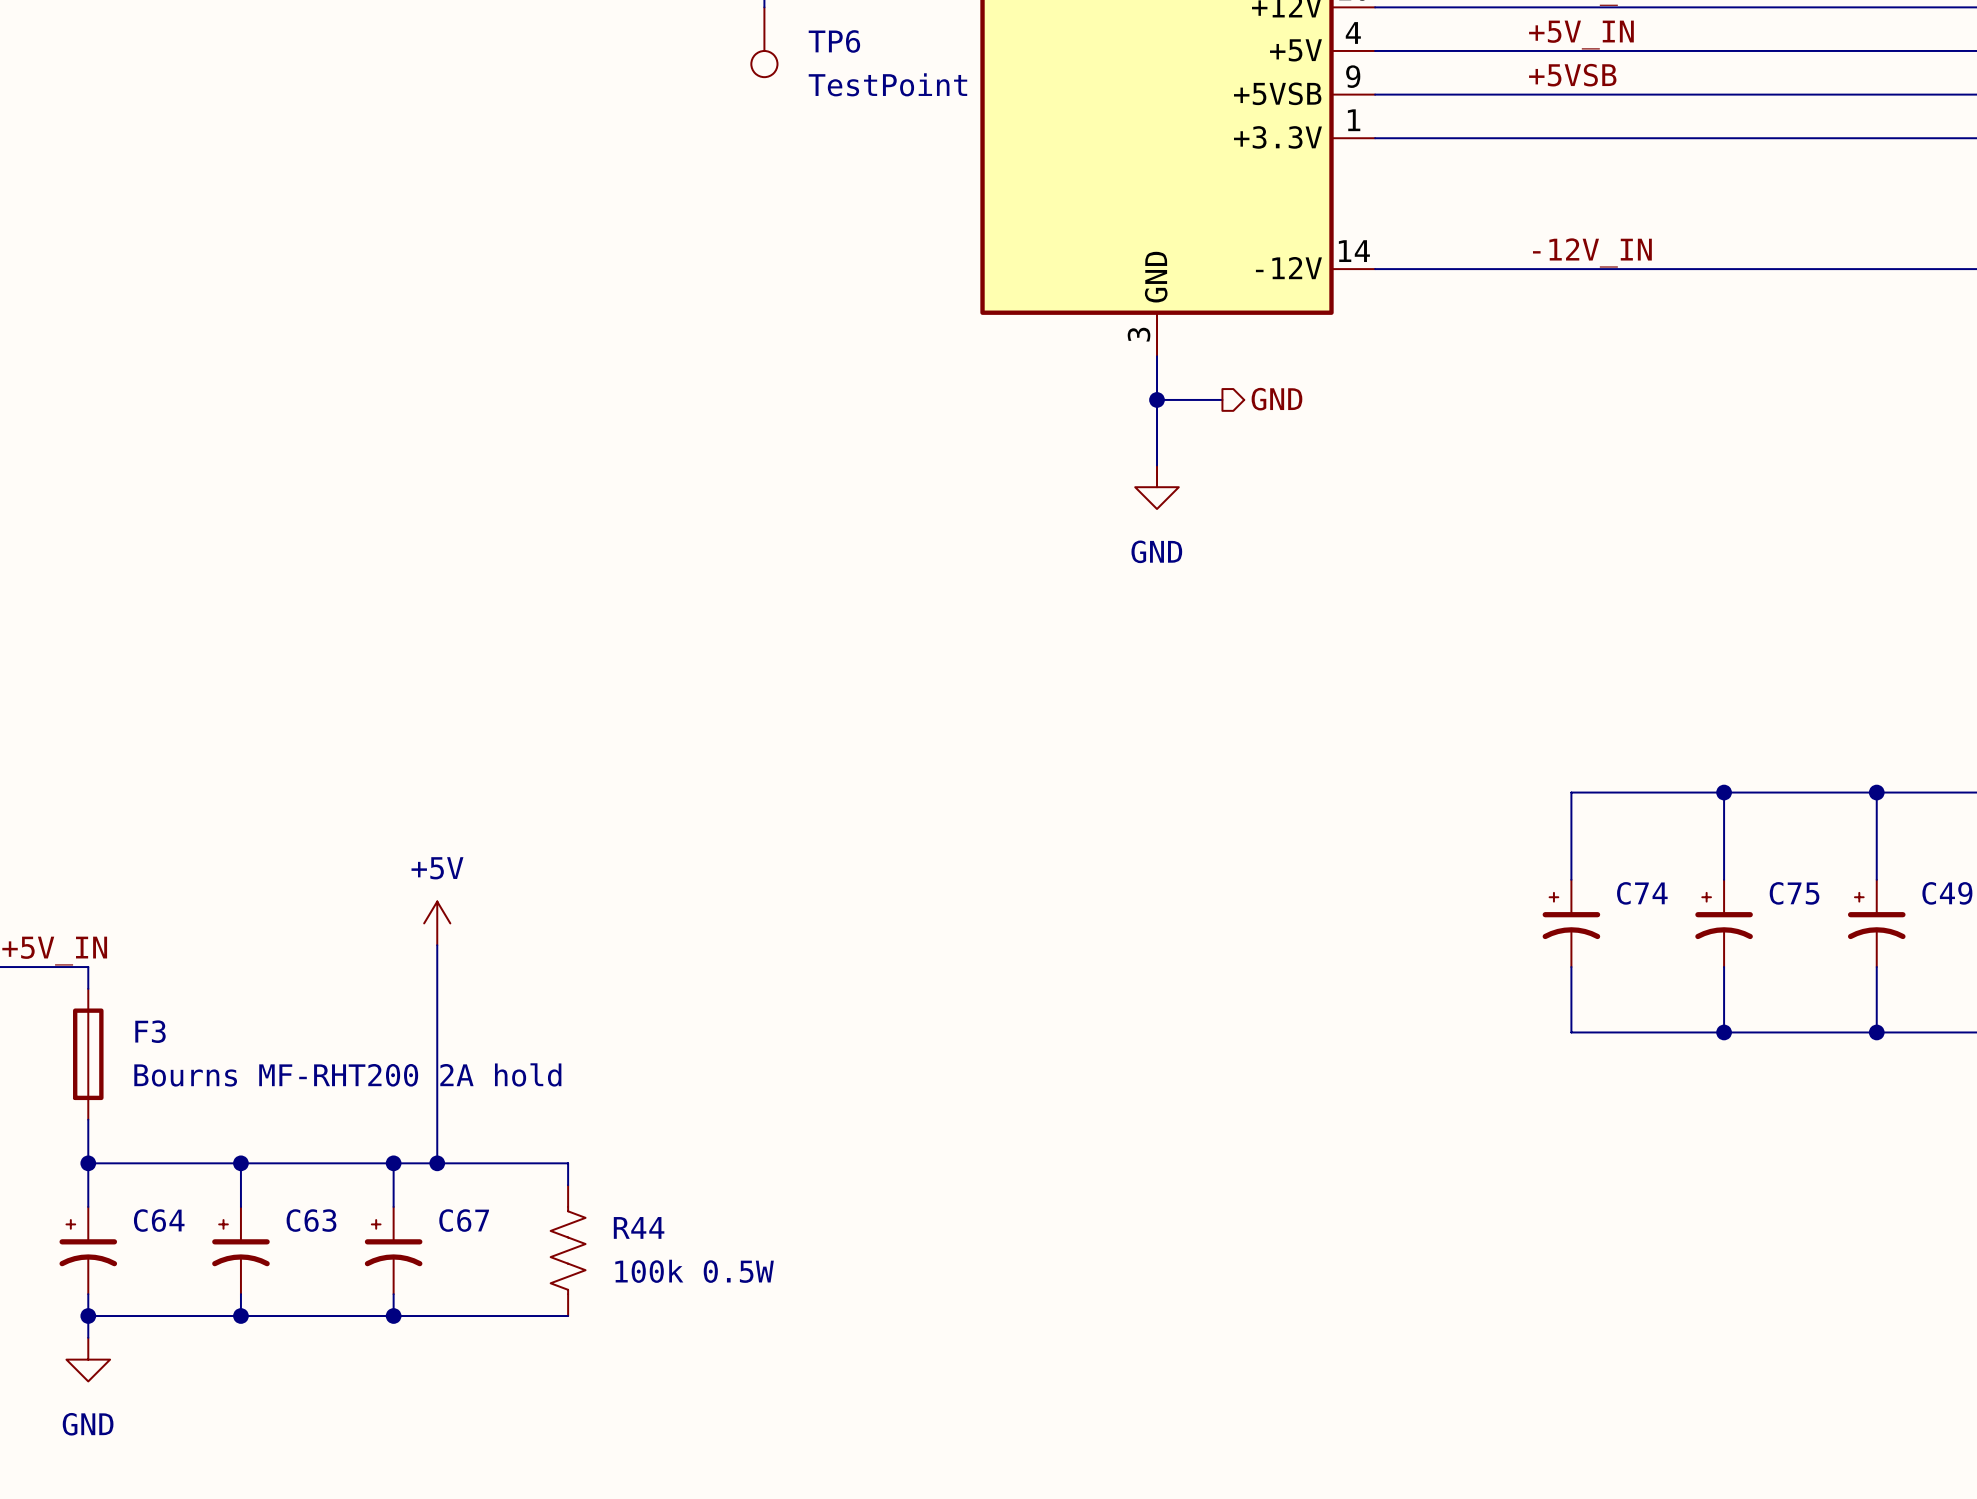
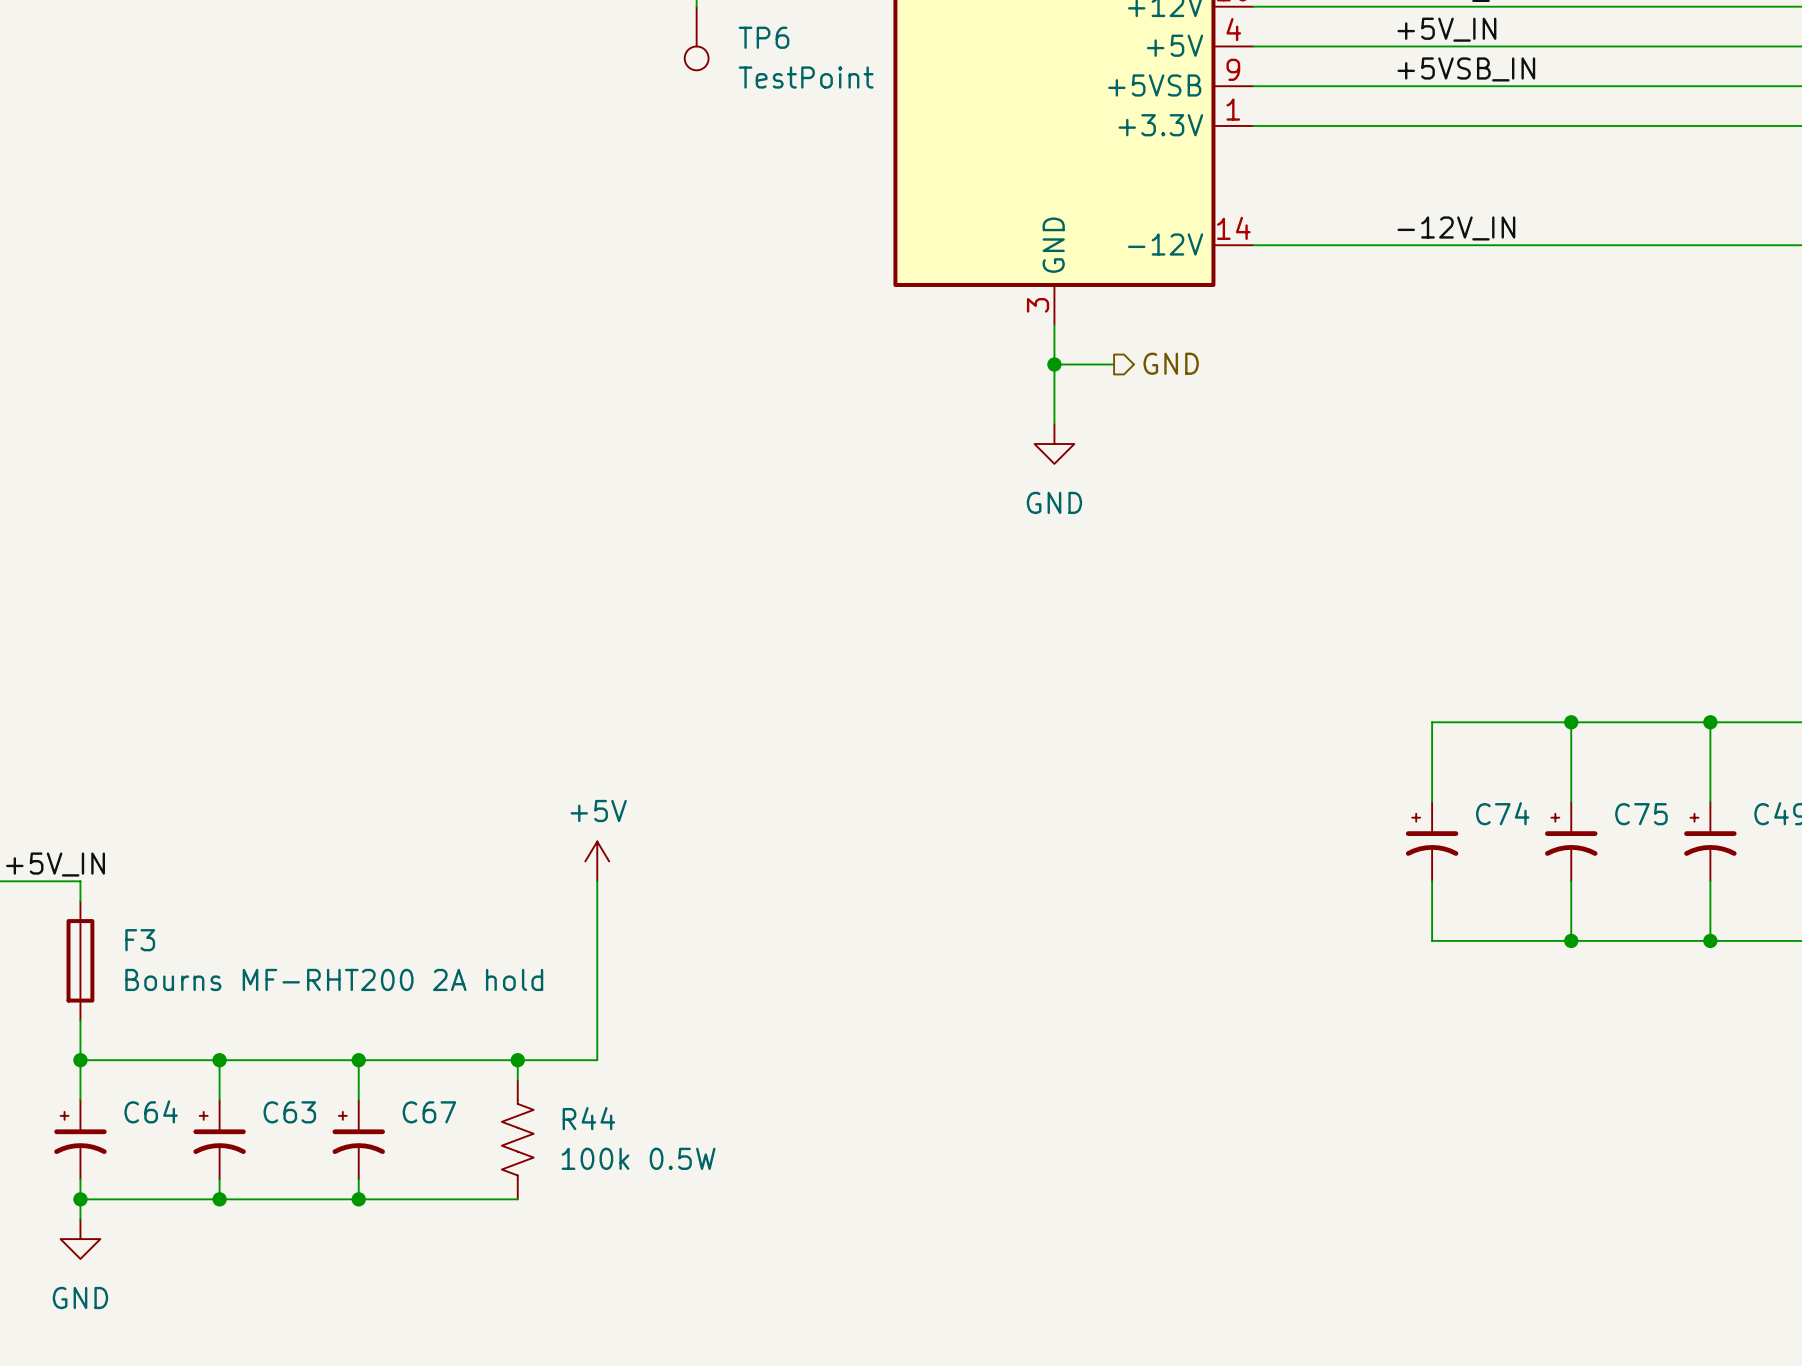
label: +5VSB (1572, 75) -> +5VSB_IN (1466, 69)
power symbol position: +5V (437, 923) -> +5V (597, 861)
wire: (437, 945) (437, 1163) -> none
wire: none -> (597, 881) (597, 1060) (517, 1060)
junction: (437, 1163) -> none
junction: none -> (517, 1060)

